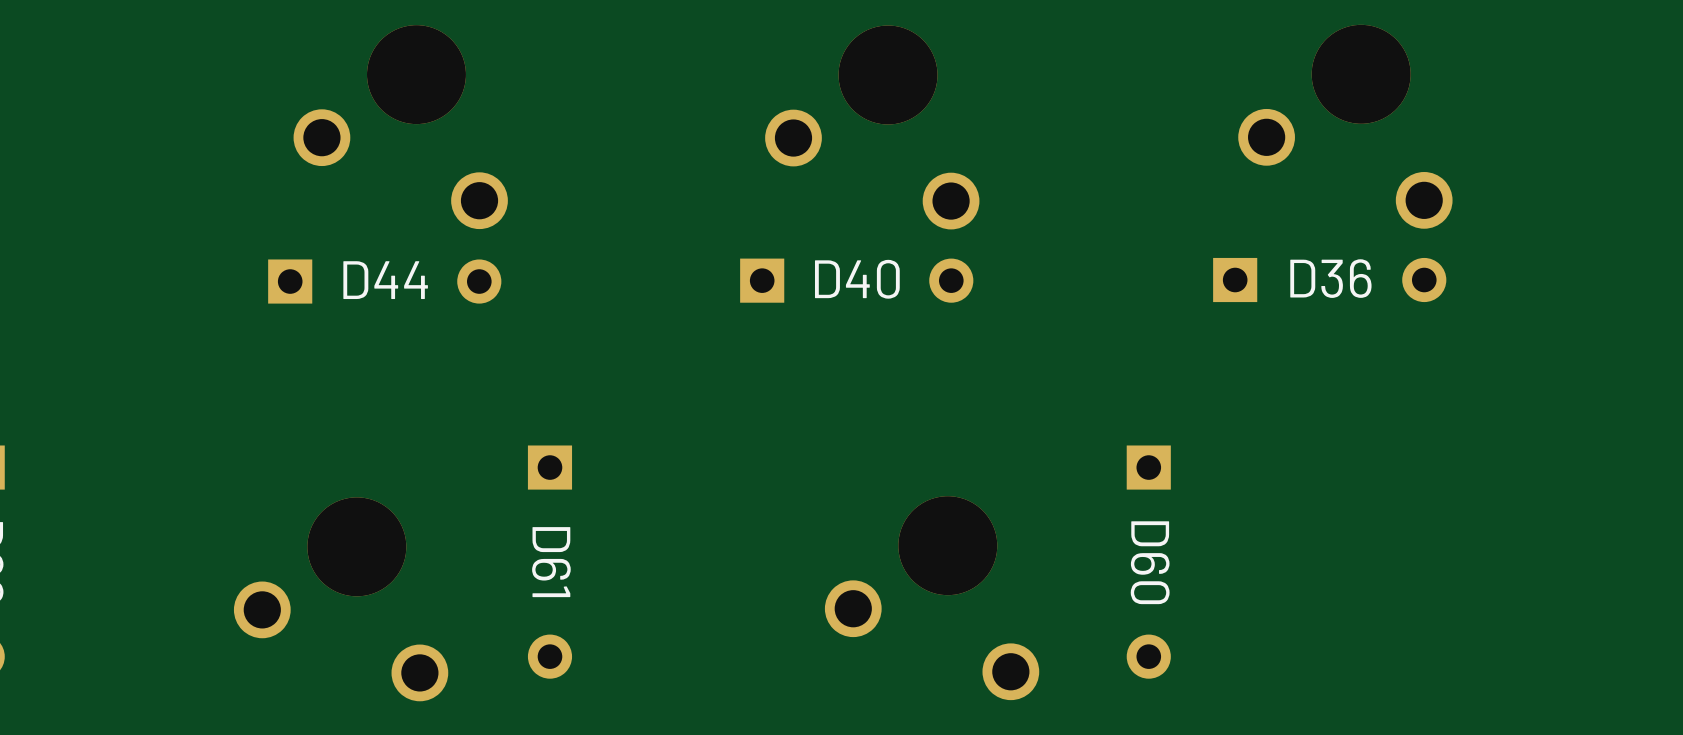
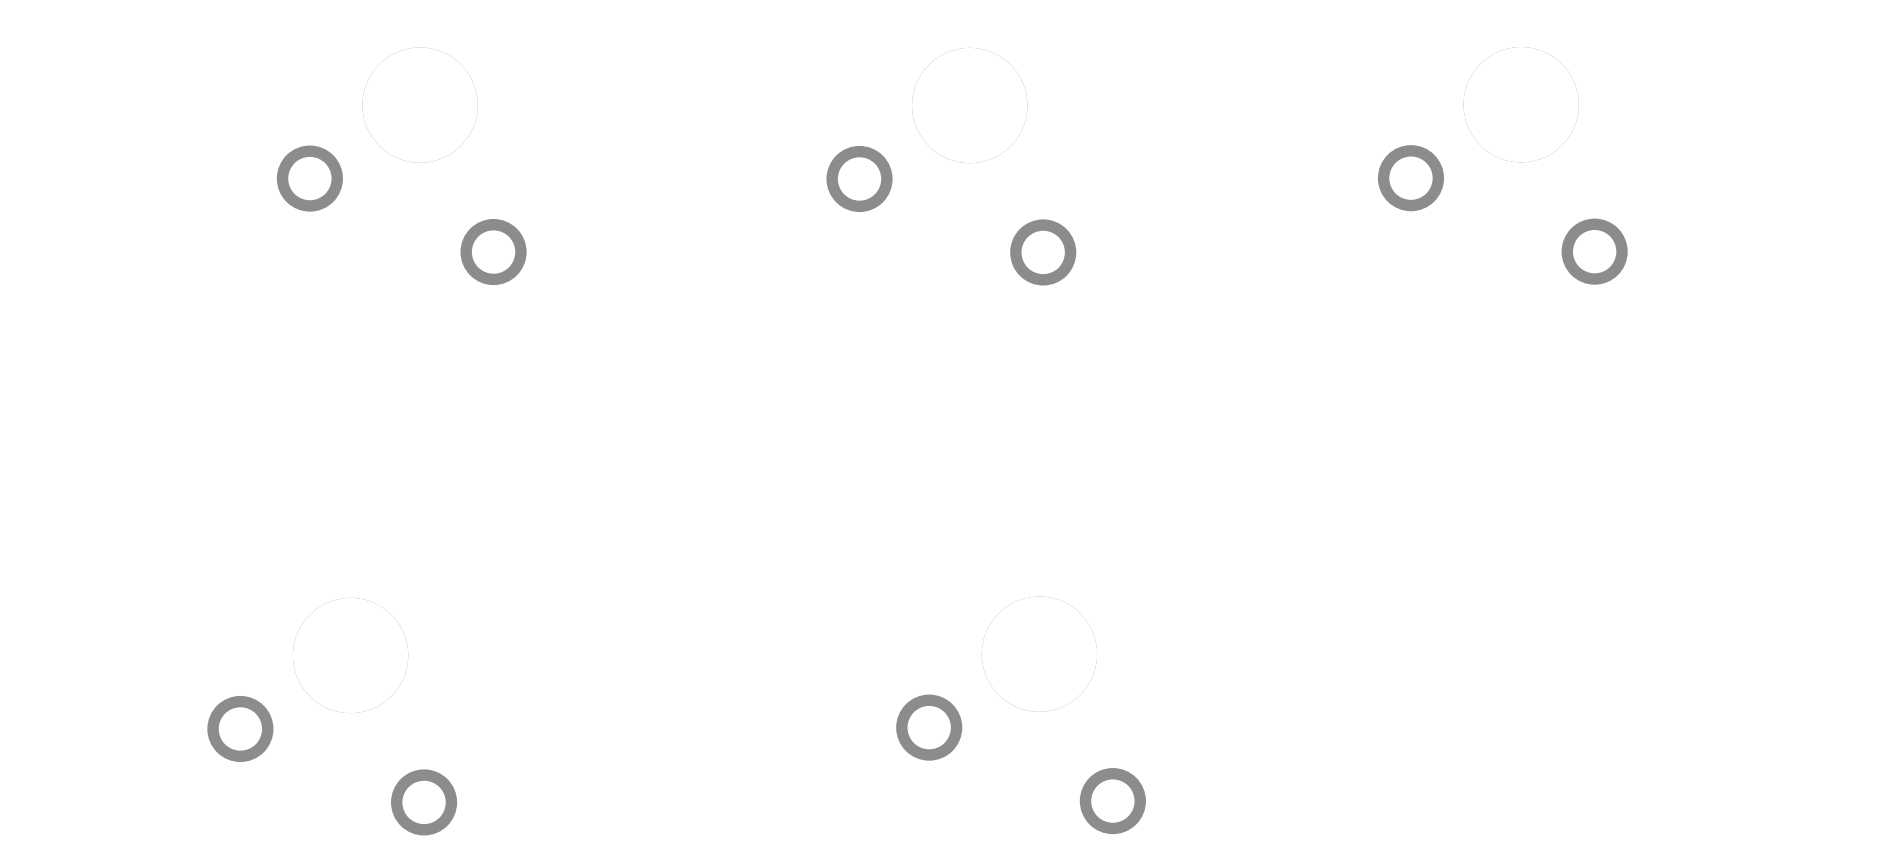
D40: (856, 280) -> none
D36: (1329, 280) -> none
D44: (384, 281) -> none
D61: (549, 562) -> none
D60: (1148, 562) -> none

